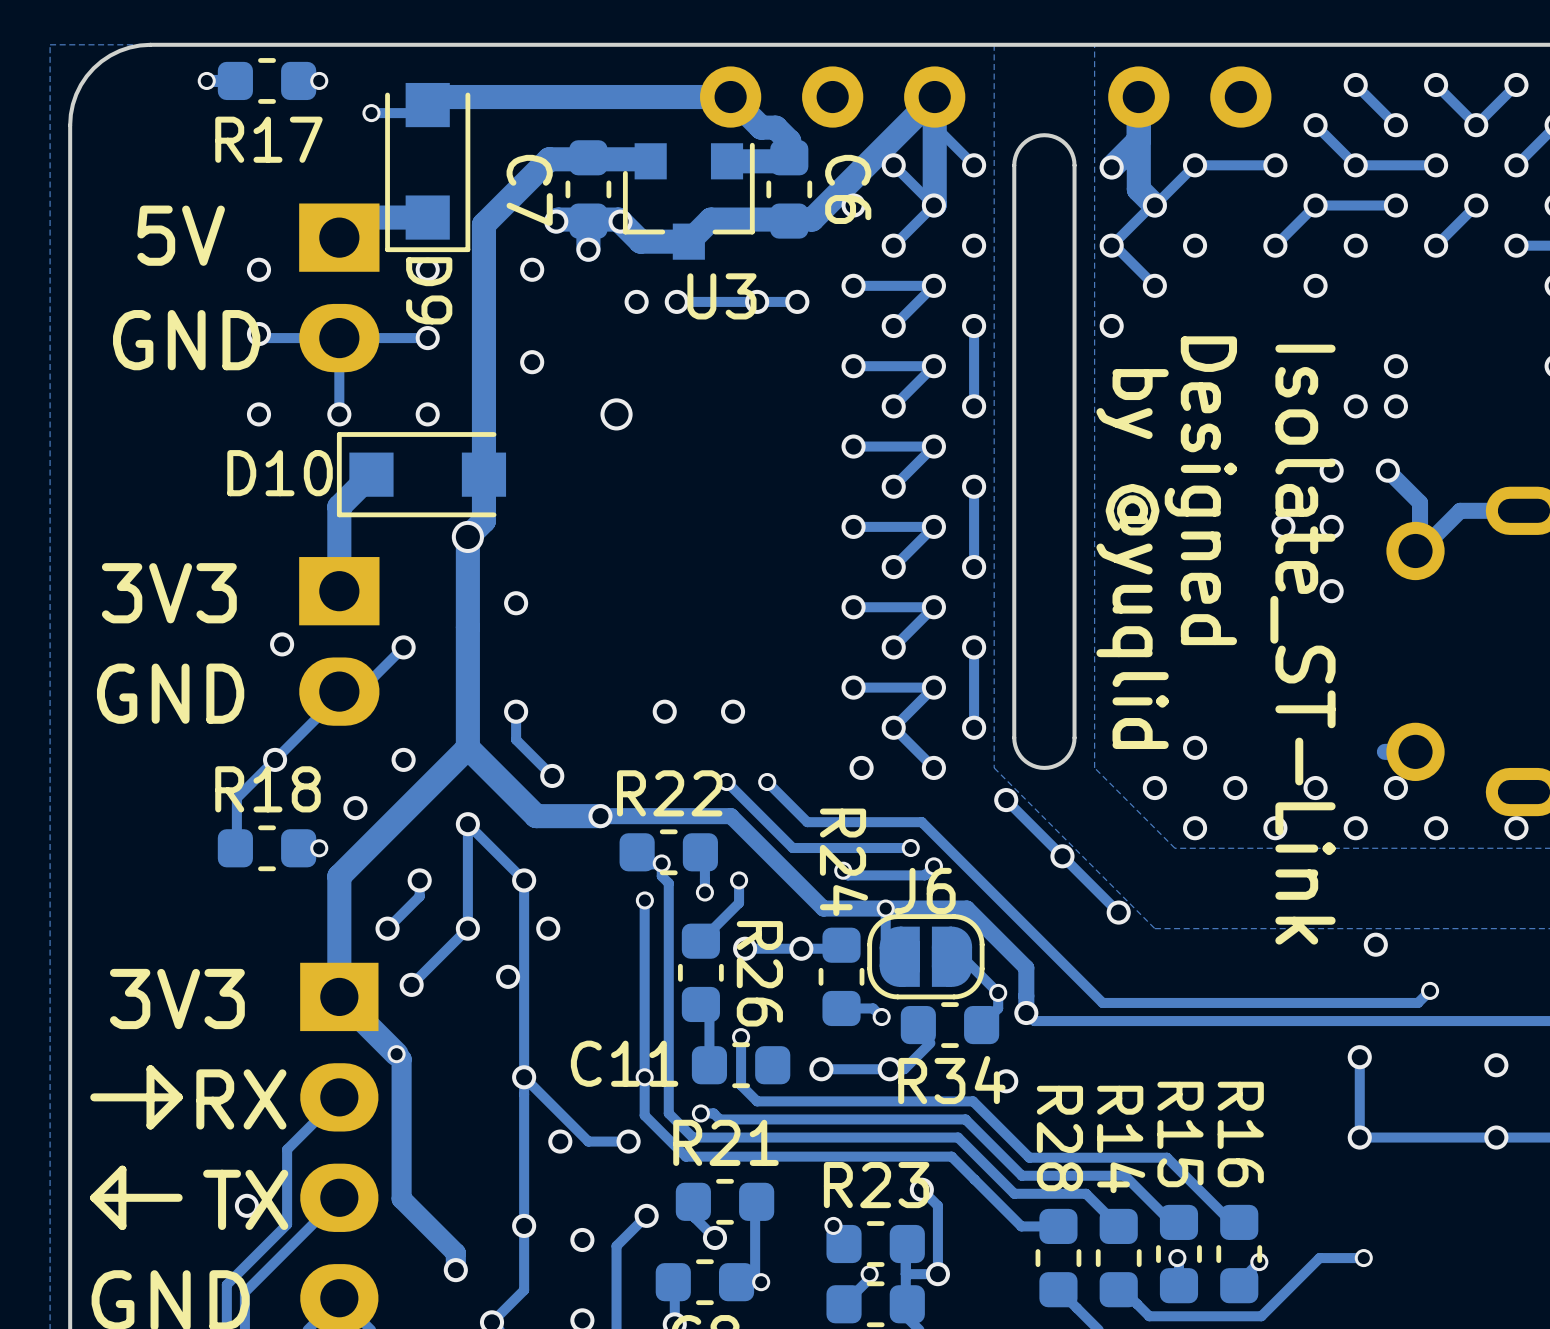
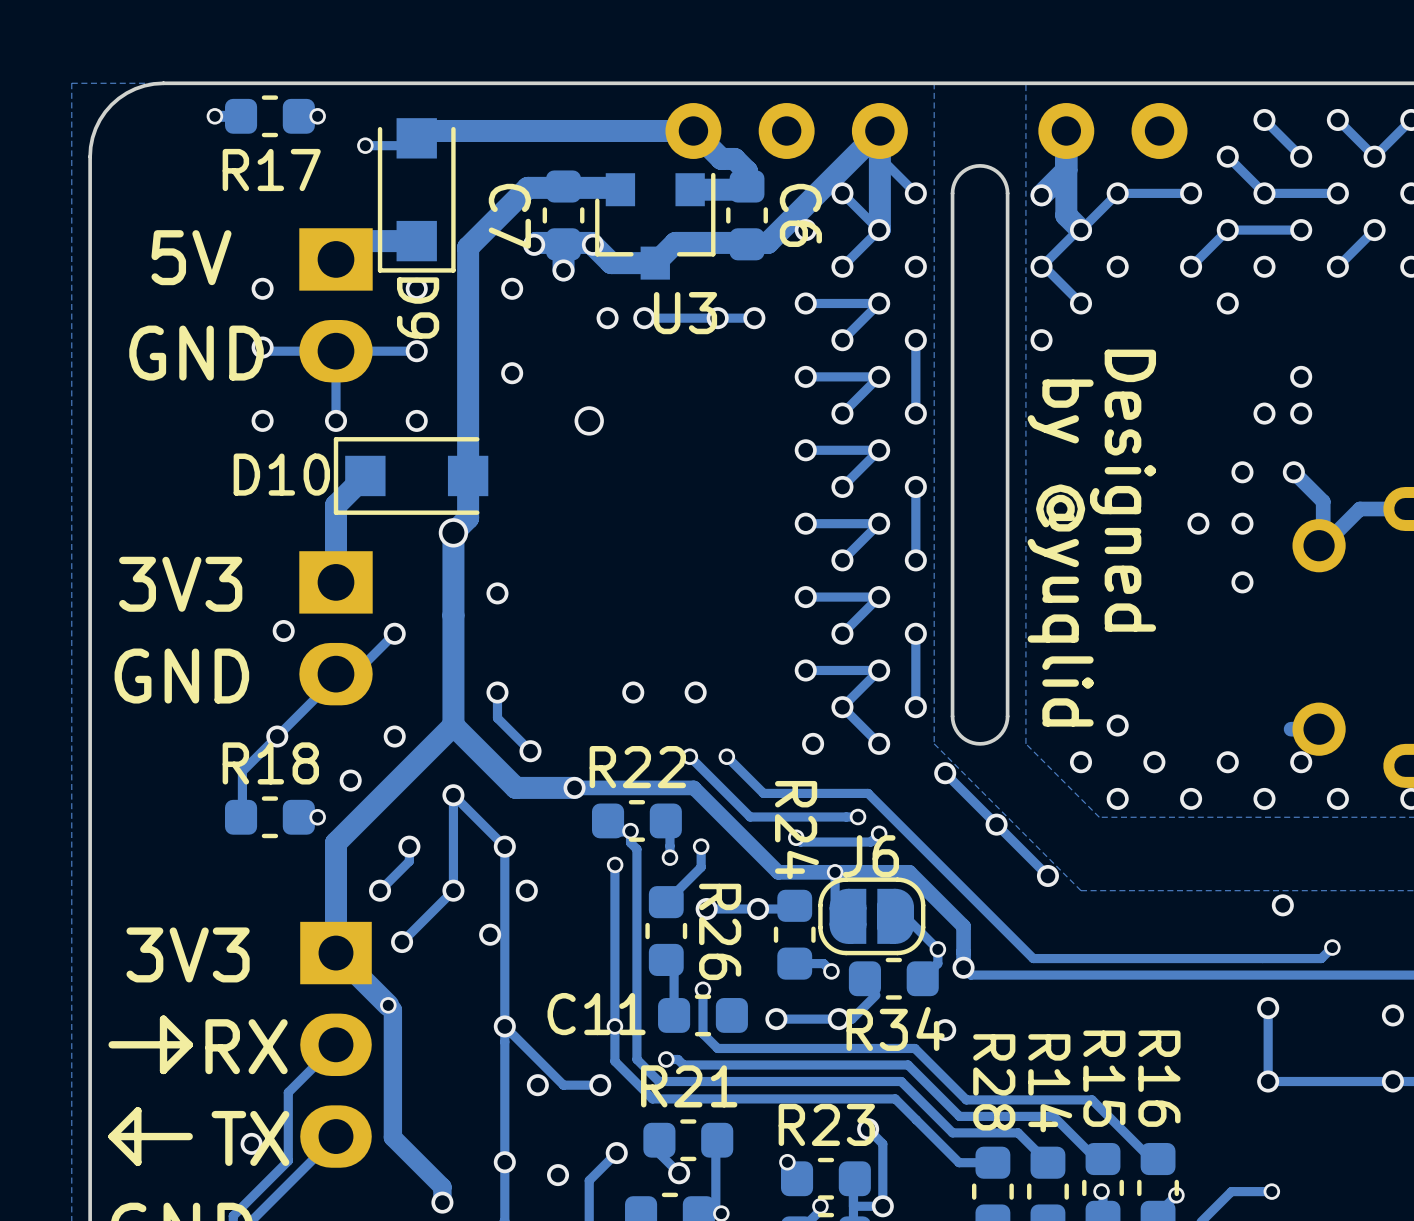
text: Isolate_ST-Link (1302, 644) -> none

